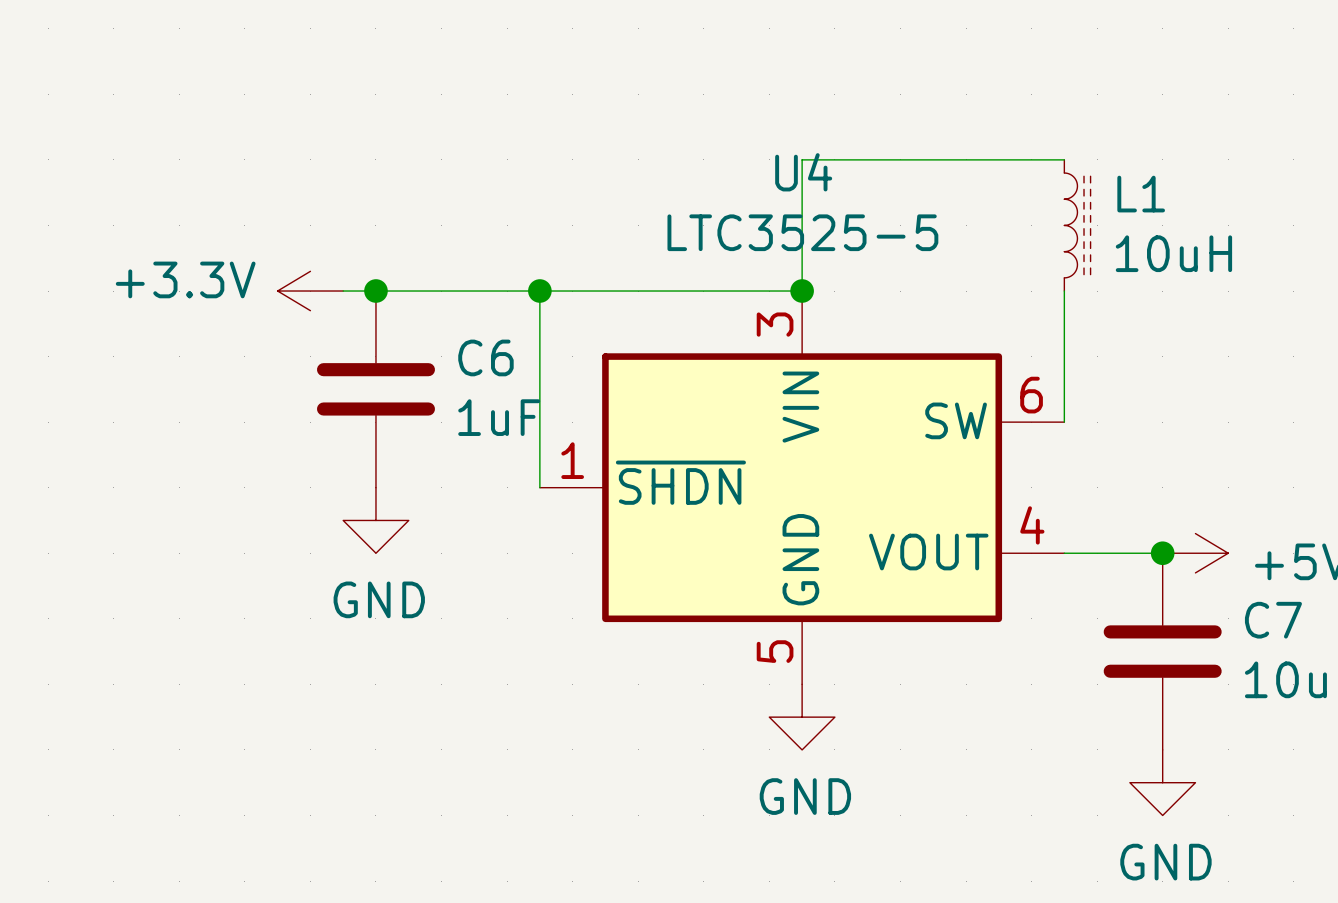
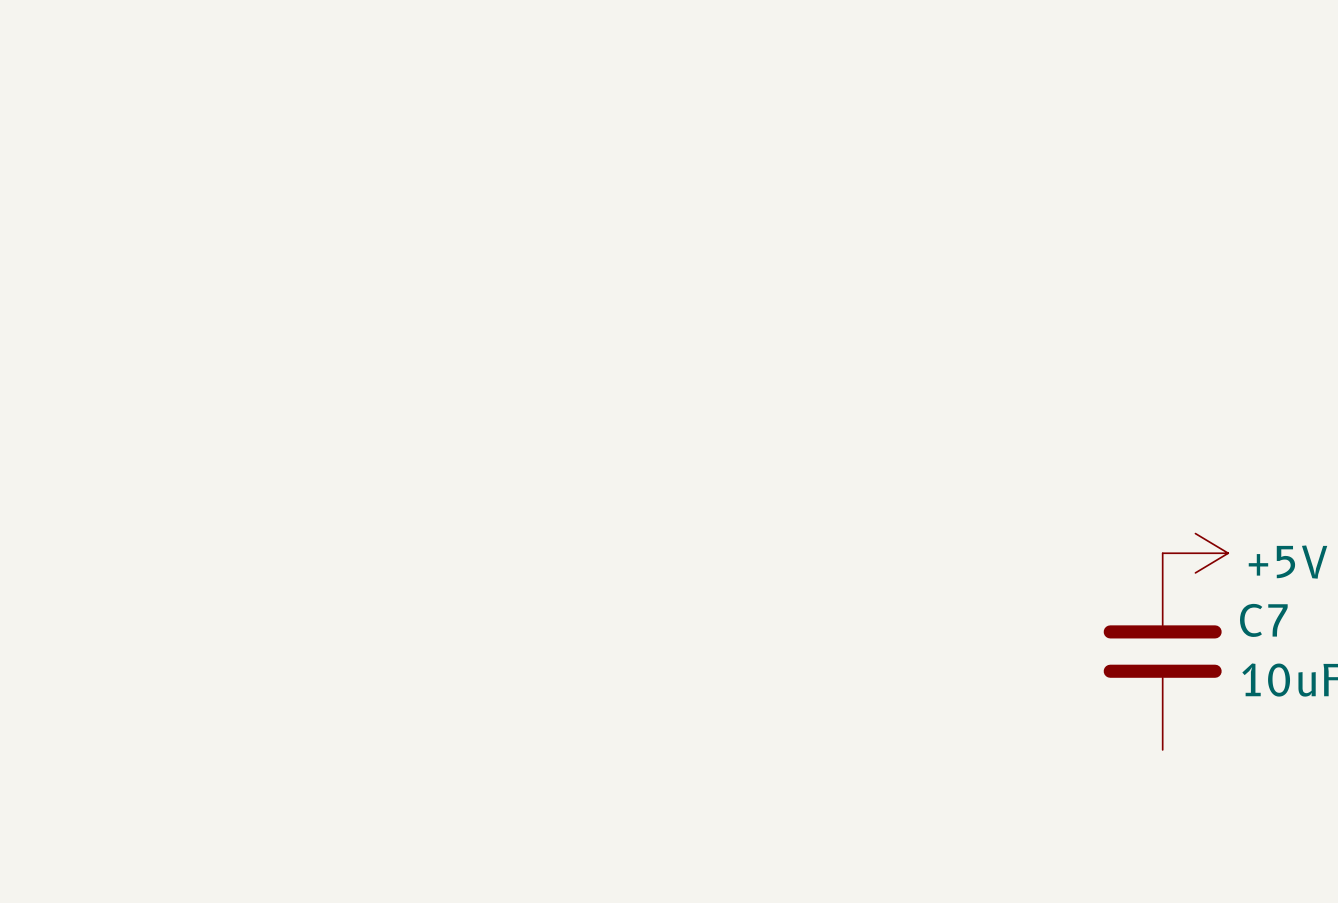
wire: (1064, 159) (802, 159) (802, 291) (343, 291) -> none
L1: 10uH (1077, 225) -> none
power symbol: +3.3V (310, 291) -> none
junction: (375, 291) -> none
wire: (539, 291) (539, 487) -> none
junction: (539, 291) -> none
junction: (802, 291) -> none
wire: (1064, 291) (1064, 422) -> none
C6: 1uF (375, 389) -> none
U4: LTC3525-5 (802, 487) -> none
power symbol: GND (375, 520) -> none
wire: (1064, 553) (1162, 553) -> none
junction: (1162, 553) -> none
power symbol: GND (802, 717) -> none
power symbol: GND (1162, 782) -> none

